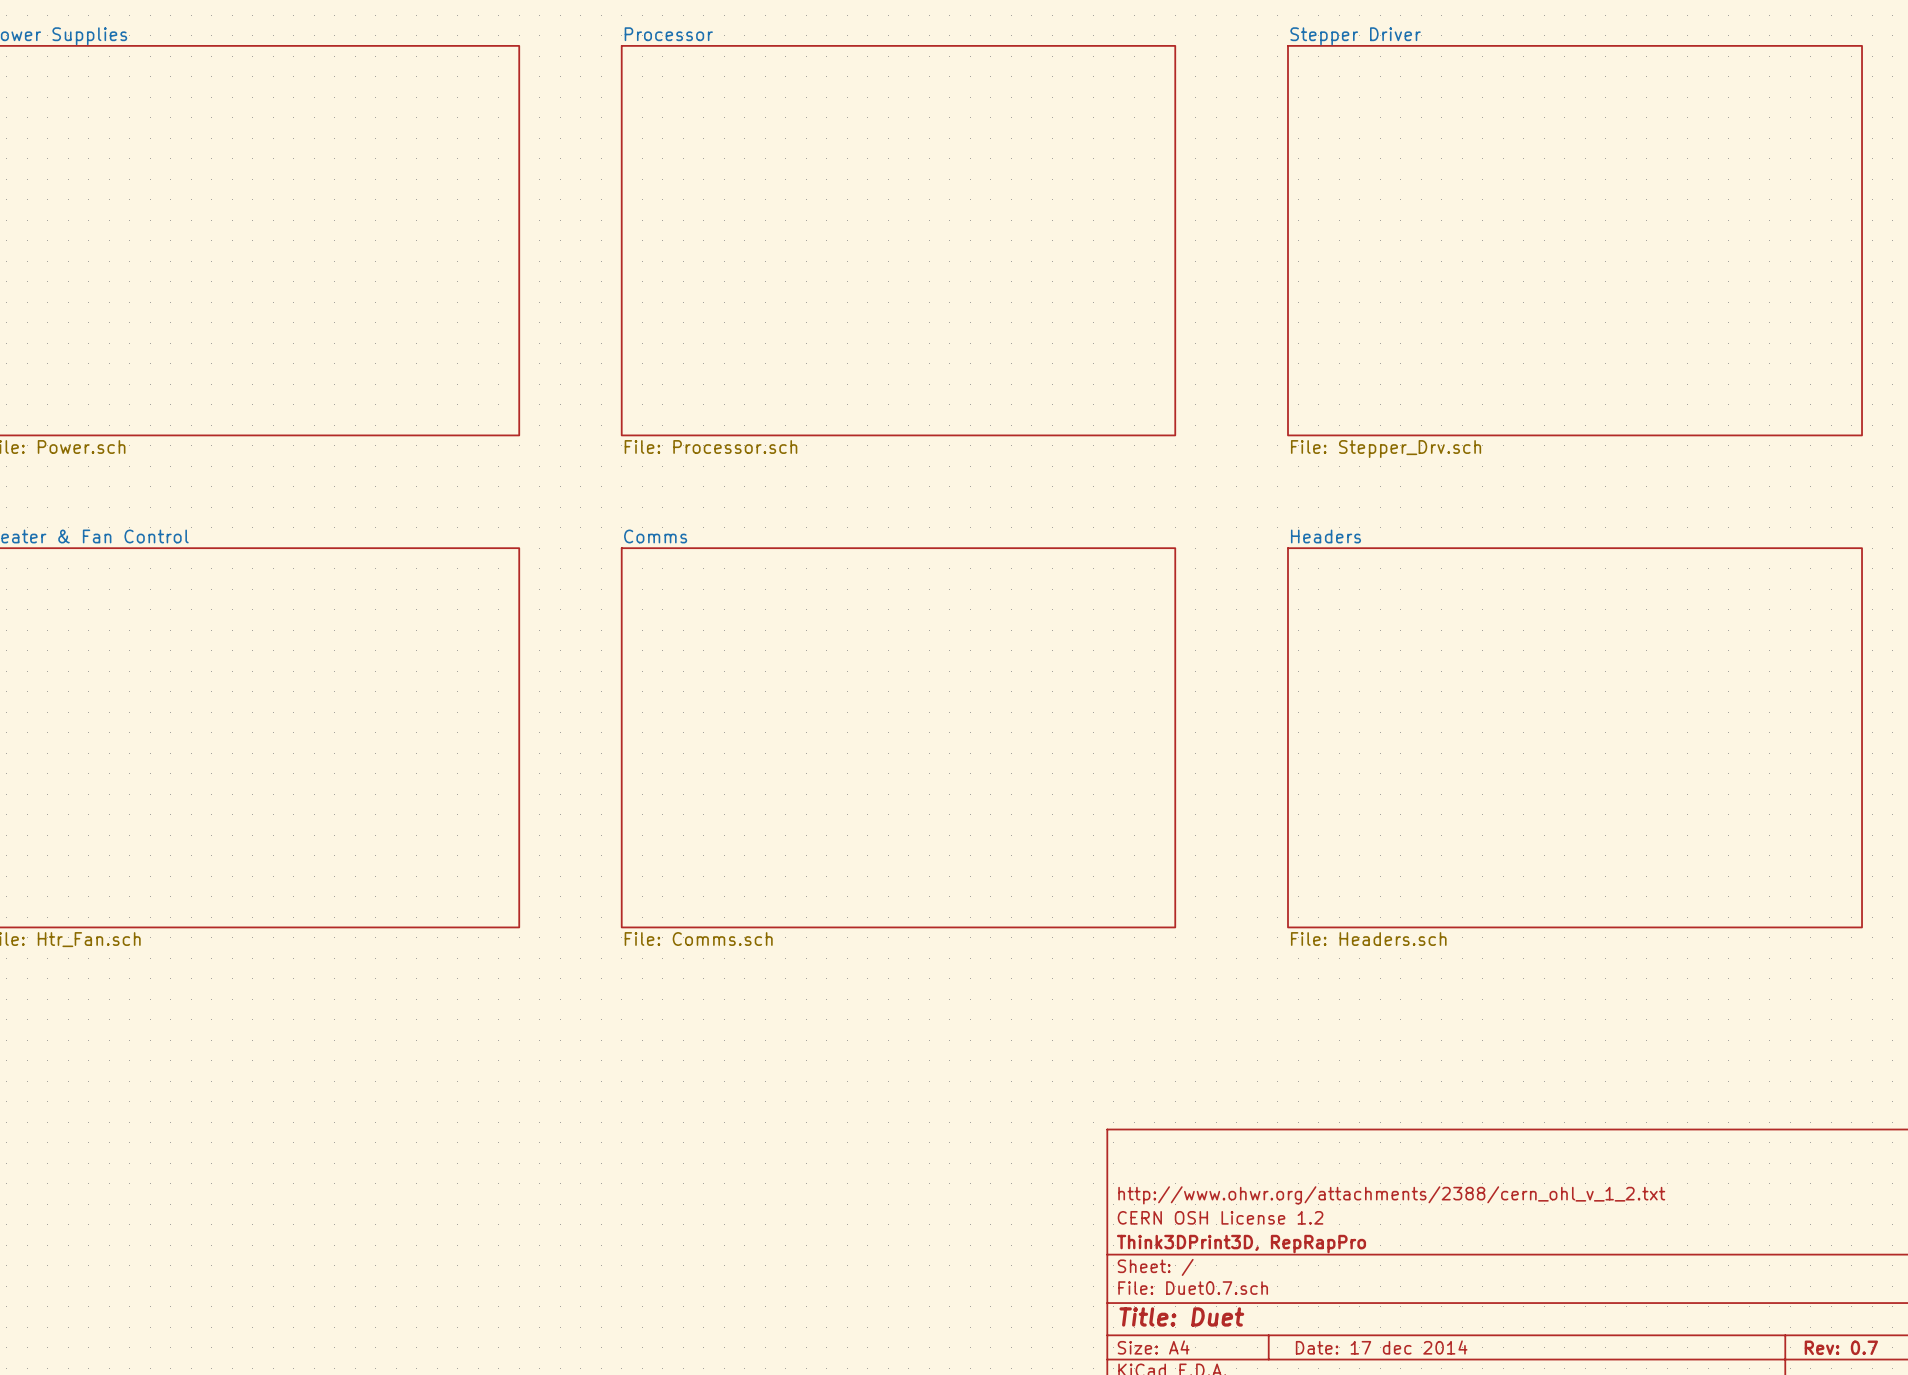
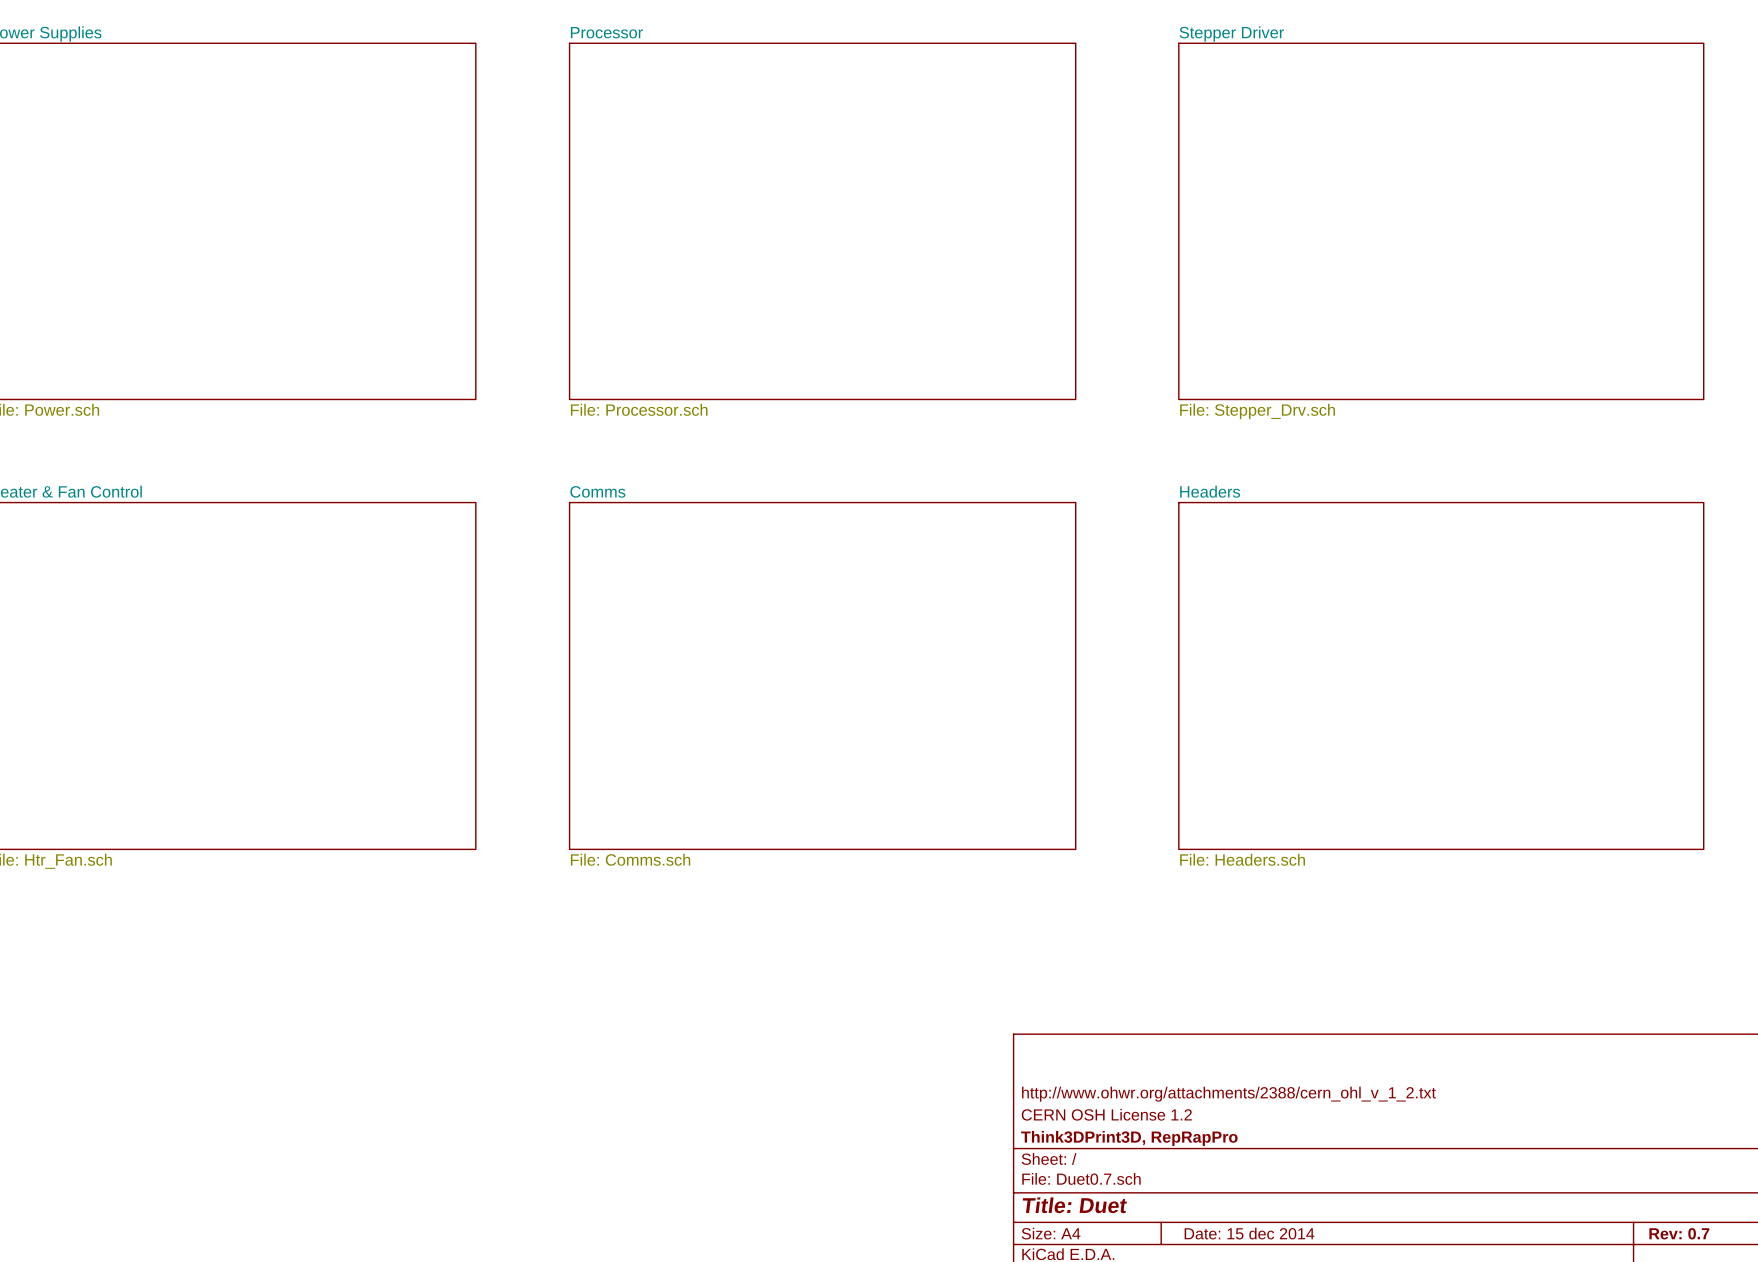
title block: Date: 17 dec 2014 (1381, 1347) -> Date: 15 dec 2014 (1249, 1233)

